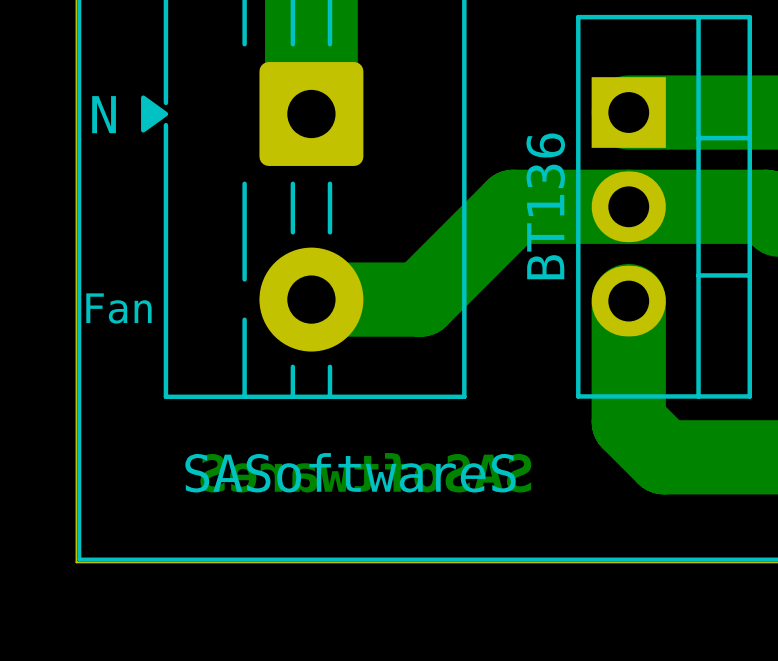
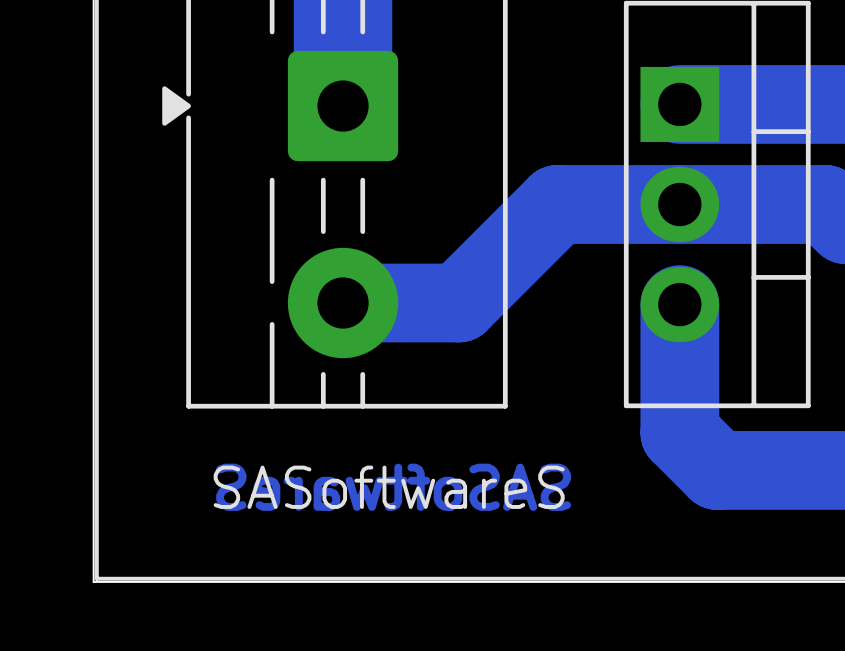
text: N (104, 114) -> none
part value: BT136 (545, 206) -> none
text: Fan (118, 308) -> none

